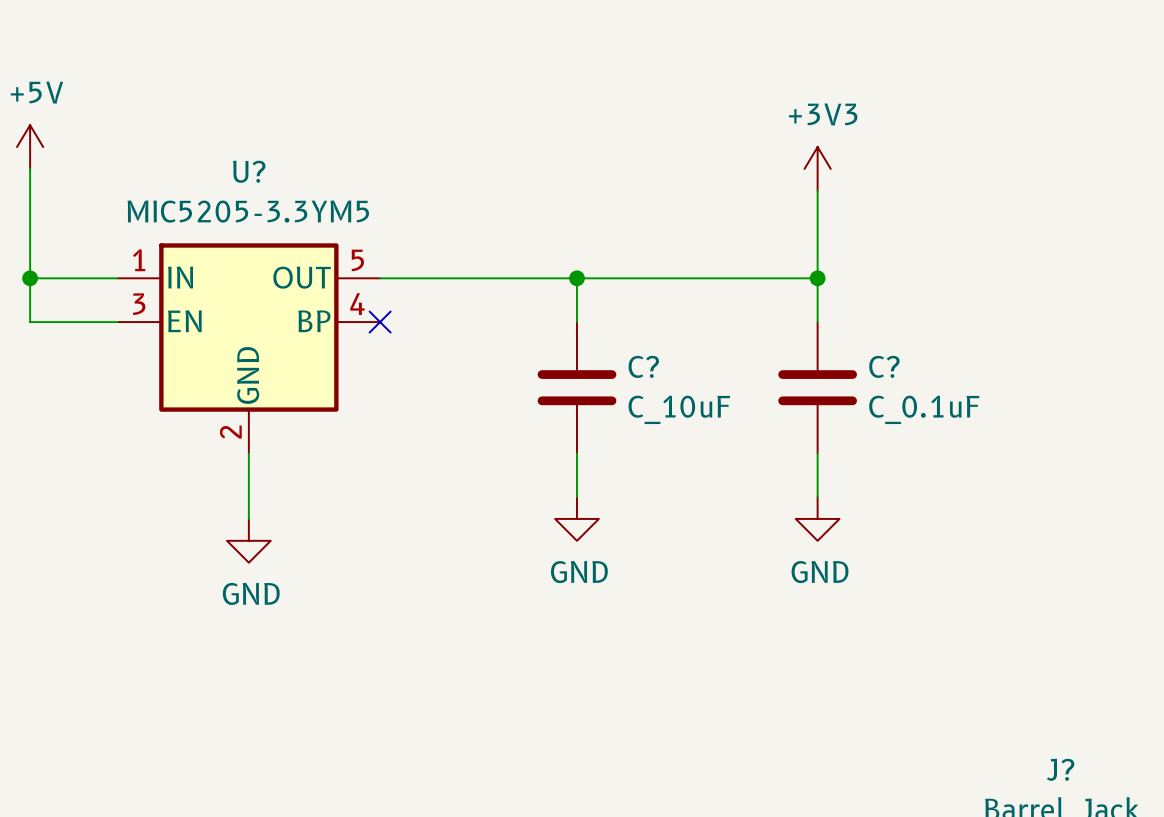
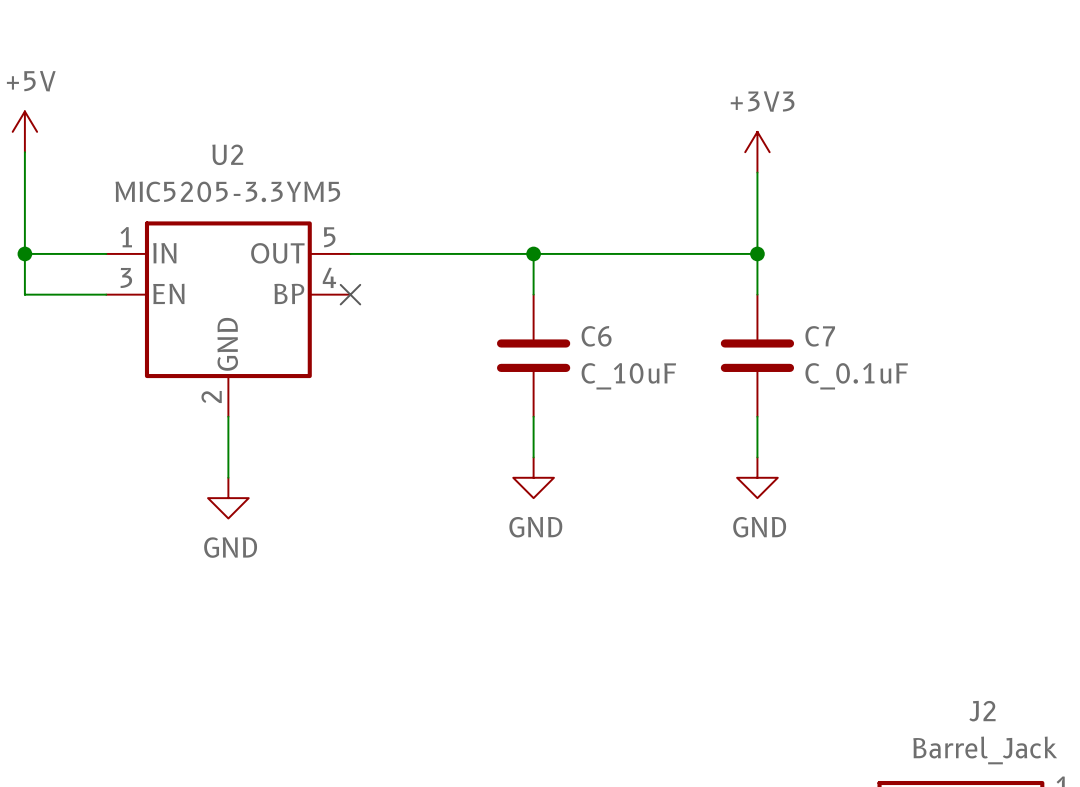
U? name: U? (249, 171) -> U2 (227, 154)
C? name: C? (643, 366) -> C6 (596, 336)
C? name: C? (884, 366) -> C7 (820, 336)
J? name: J? (1060, 769) -> J2 (982, 711)

